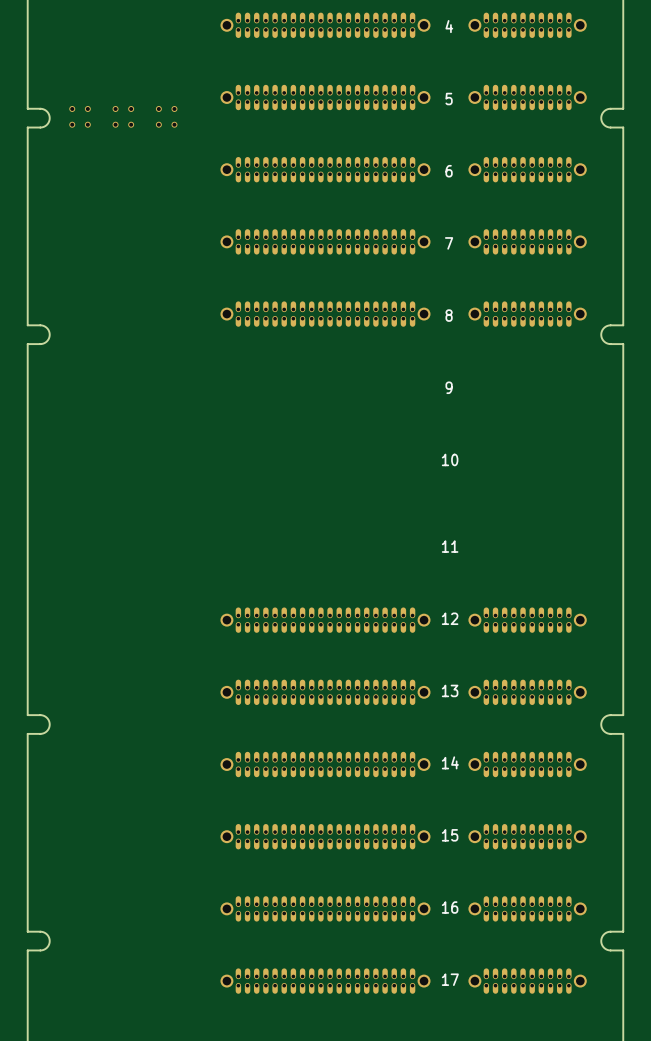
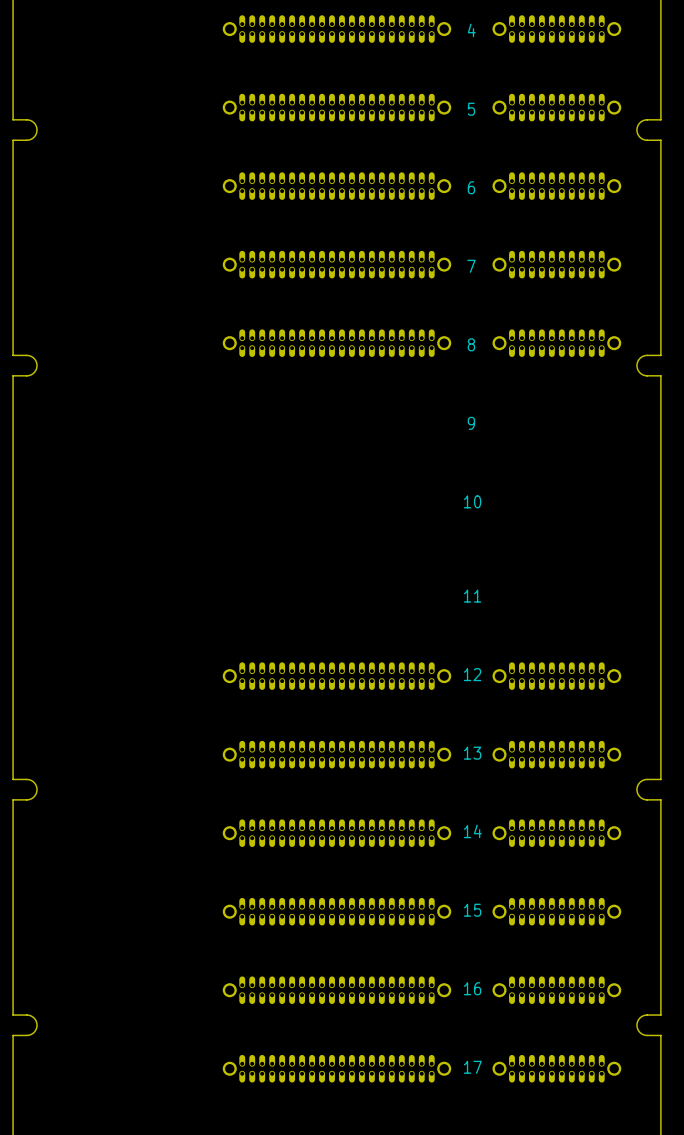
part: (80, 116) -> none
part: (123, 116) -> none
part: (166, 116) -> none

